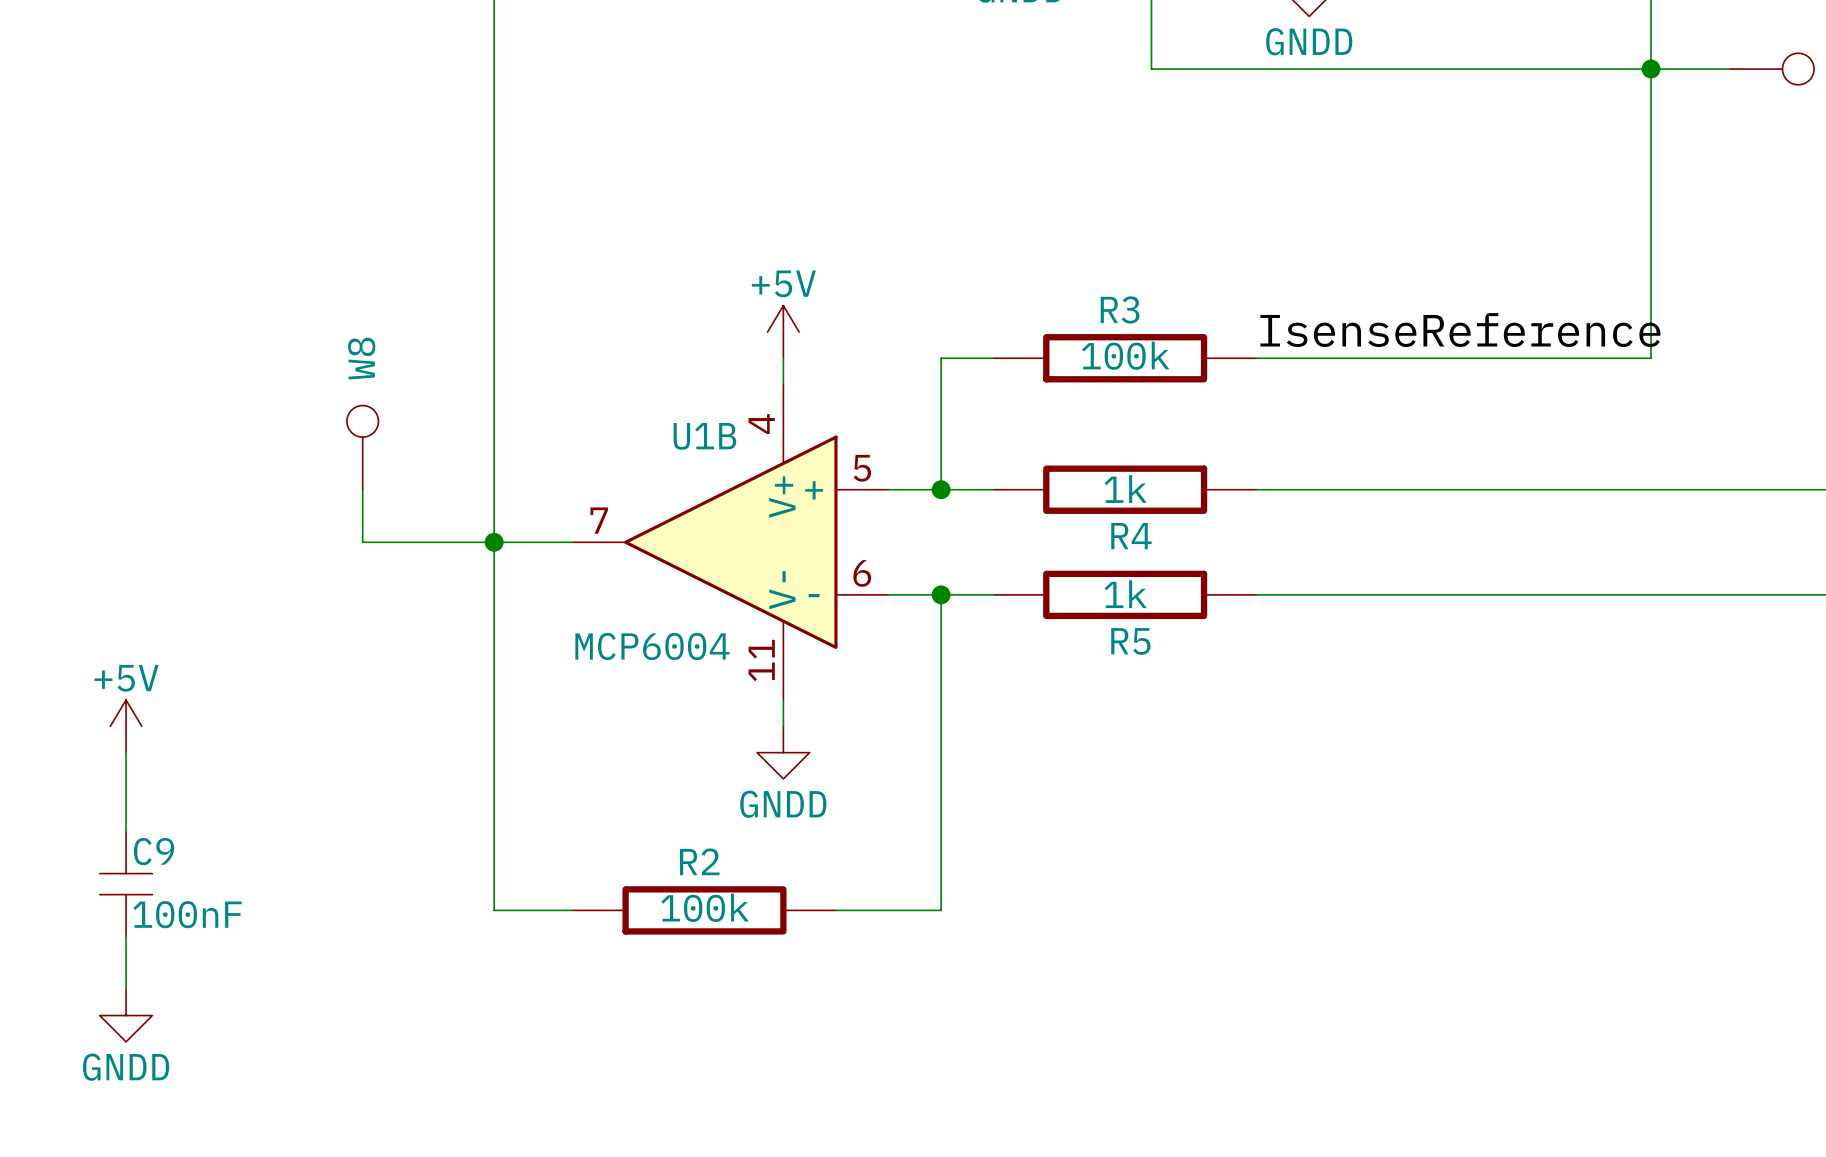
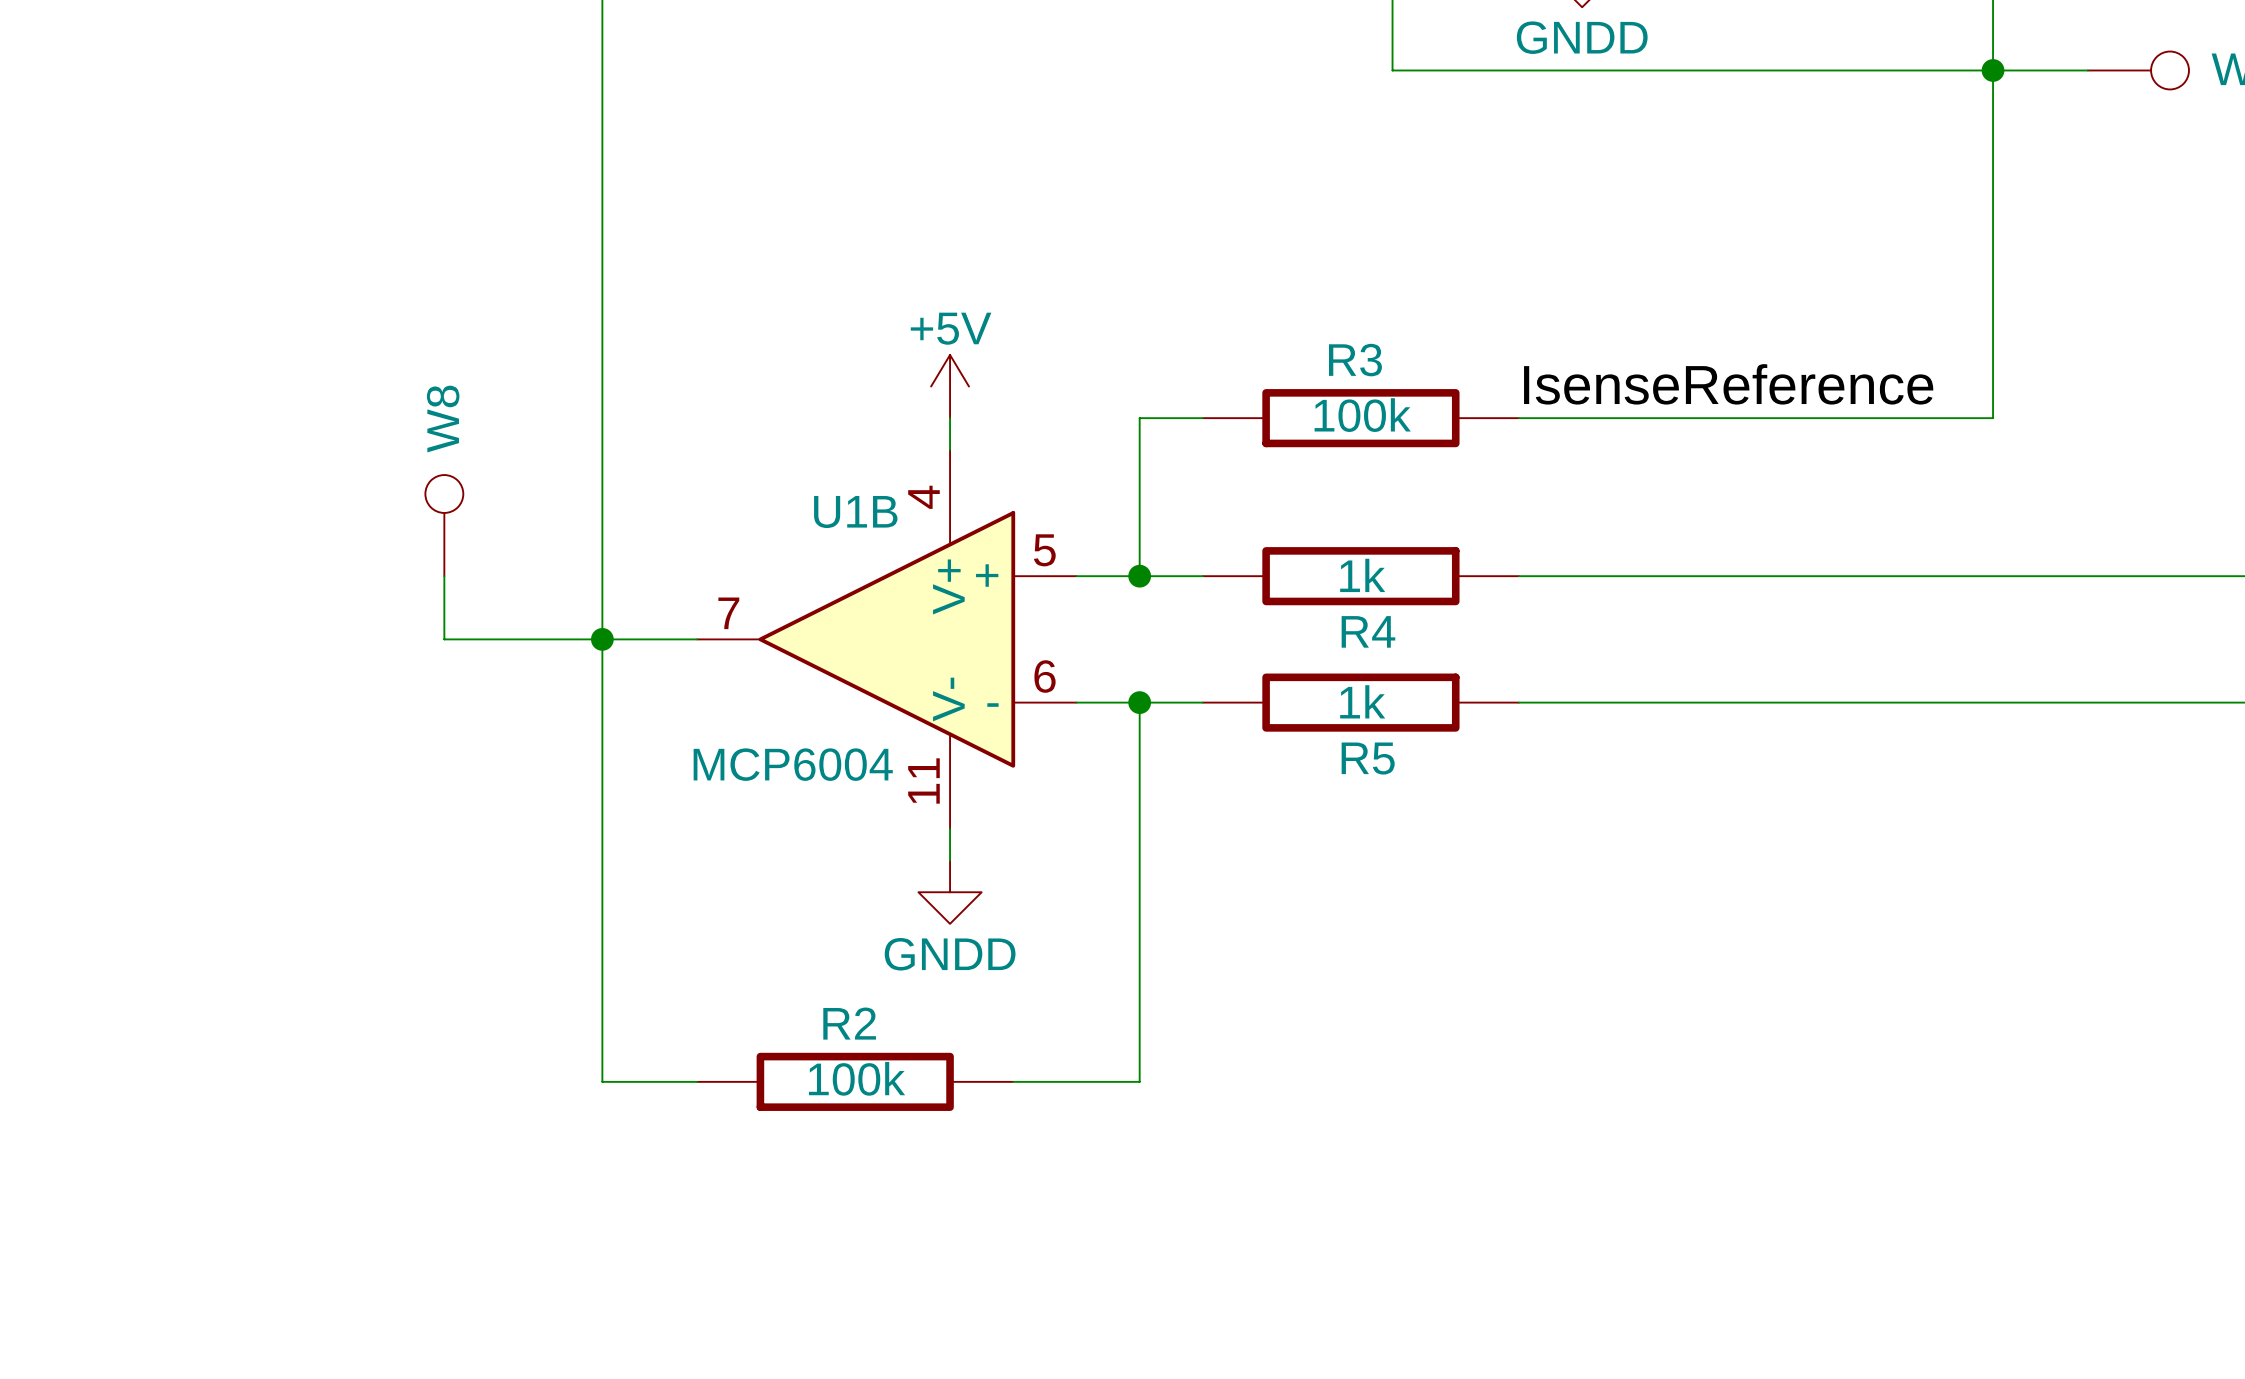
power symbol: +5V (126, 726) -> none
wire: (126, 752) (126, 831) -> none
C9: 100nF (126, 884) -> none
wire: (126, 936) (126, 989) -> none
power symbol: GNDD (126, 1015) -> none

